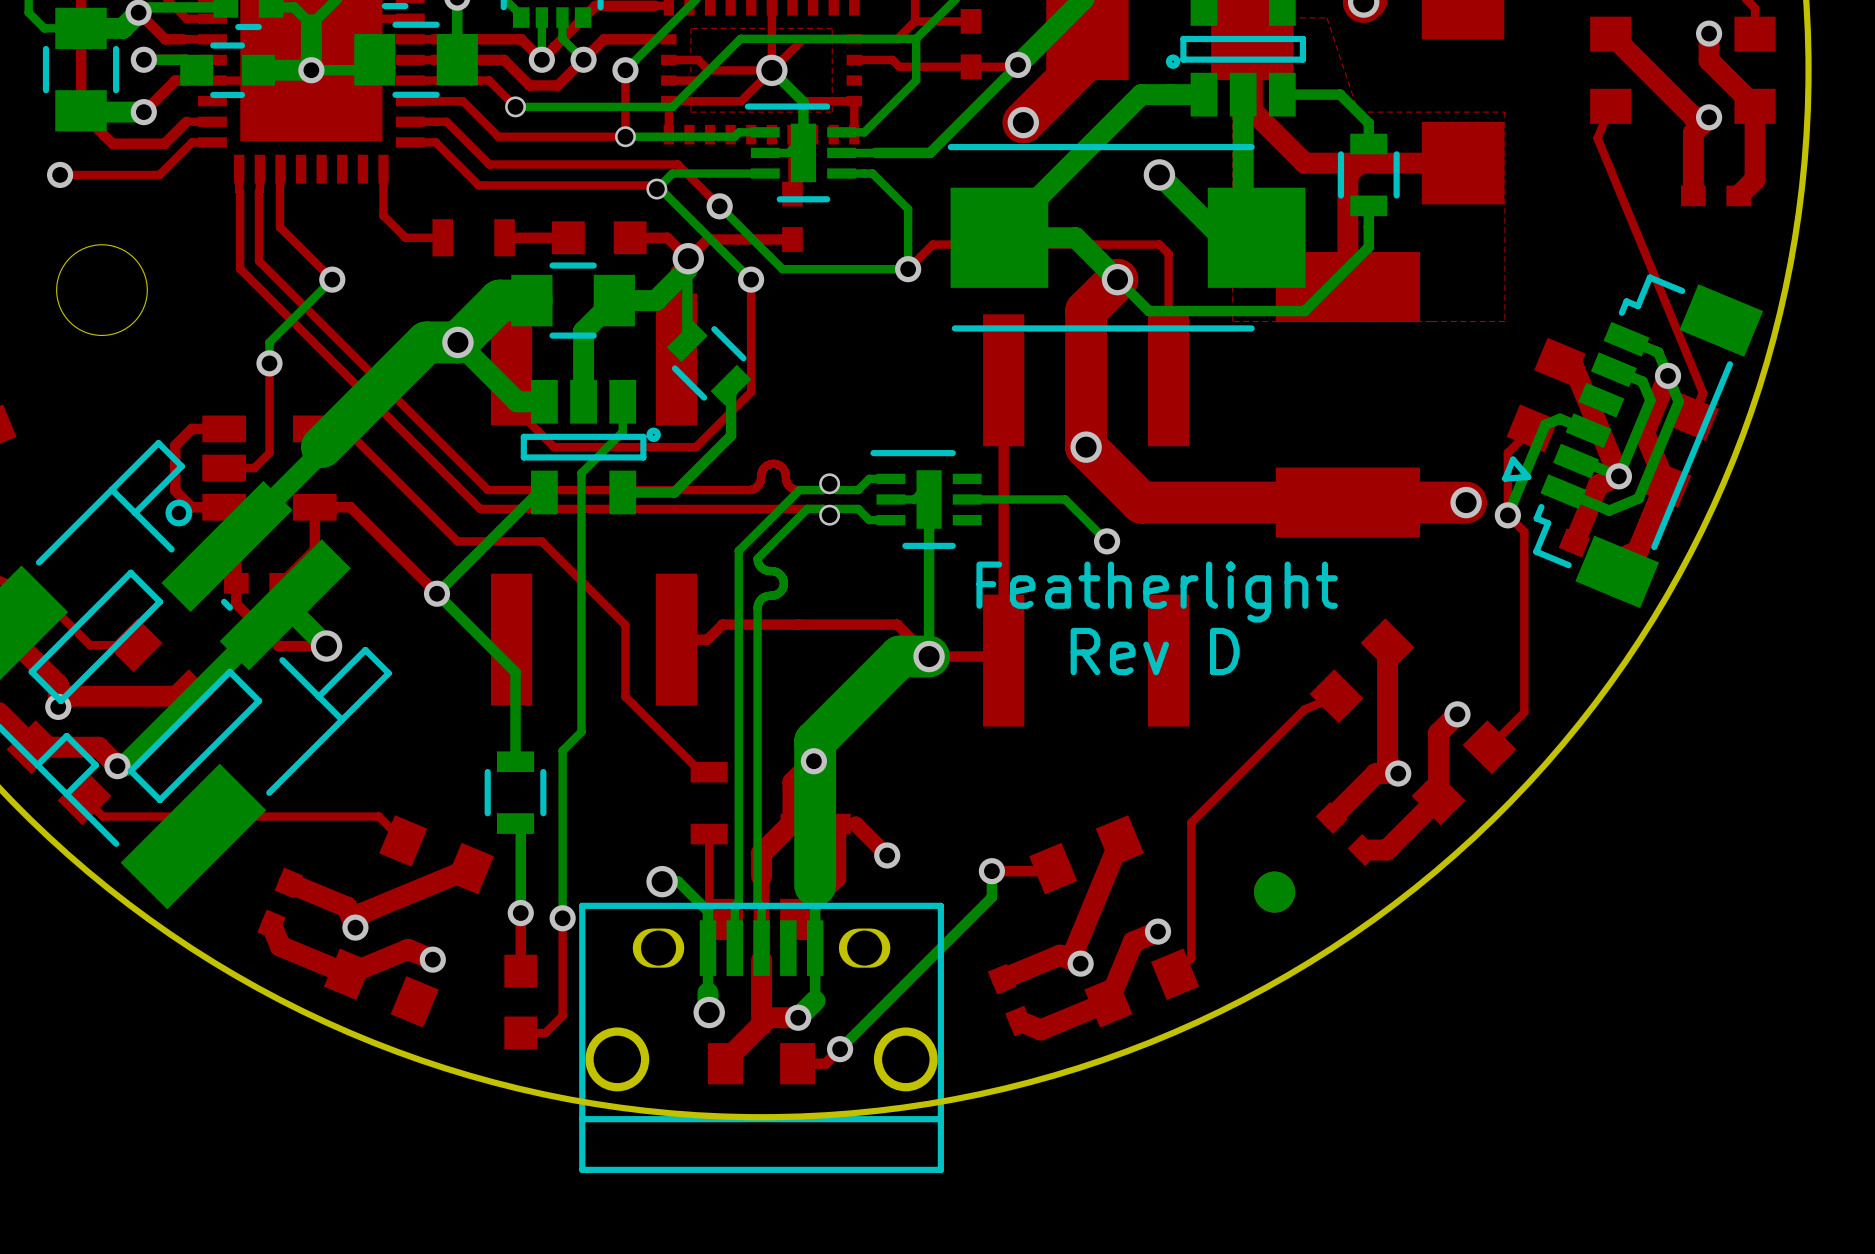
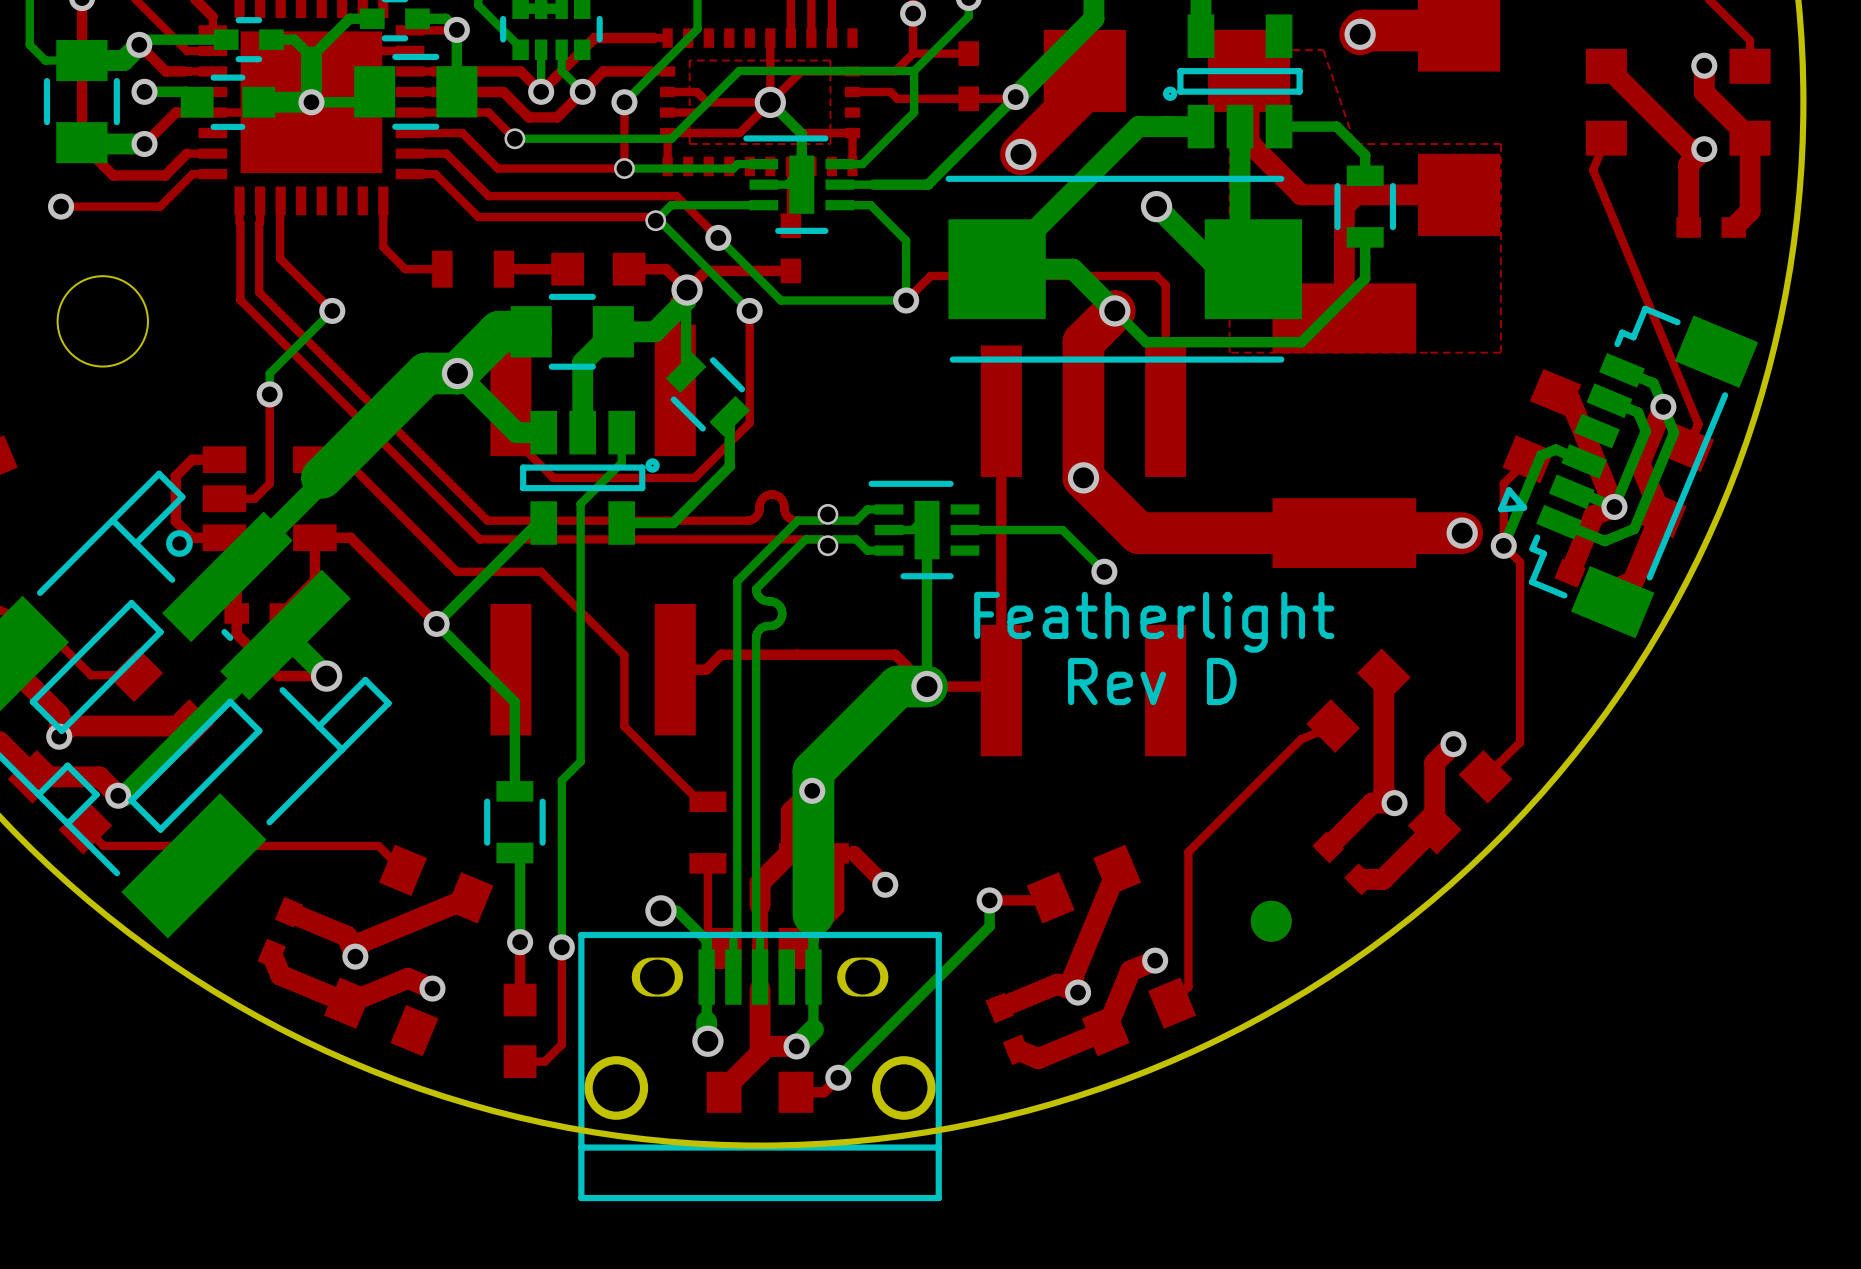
part footprint: [947, 143, 1306, 332] -> [945, 175, 1303, 363]

